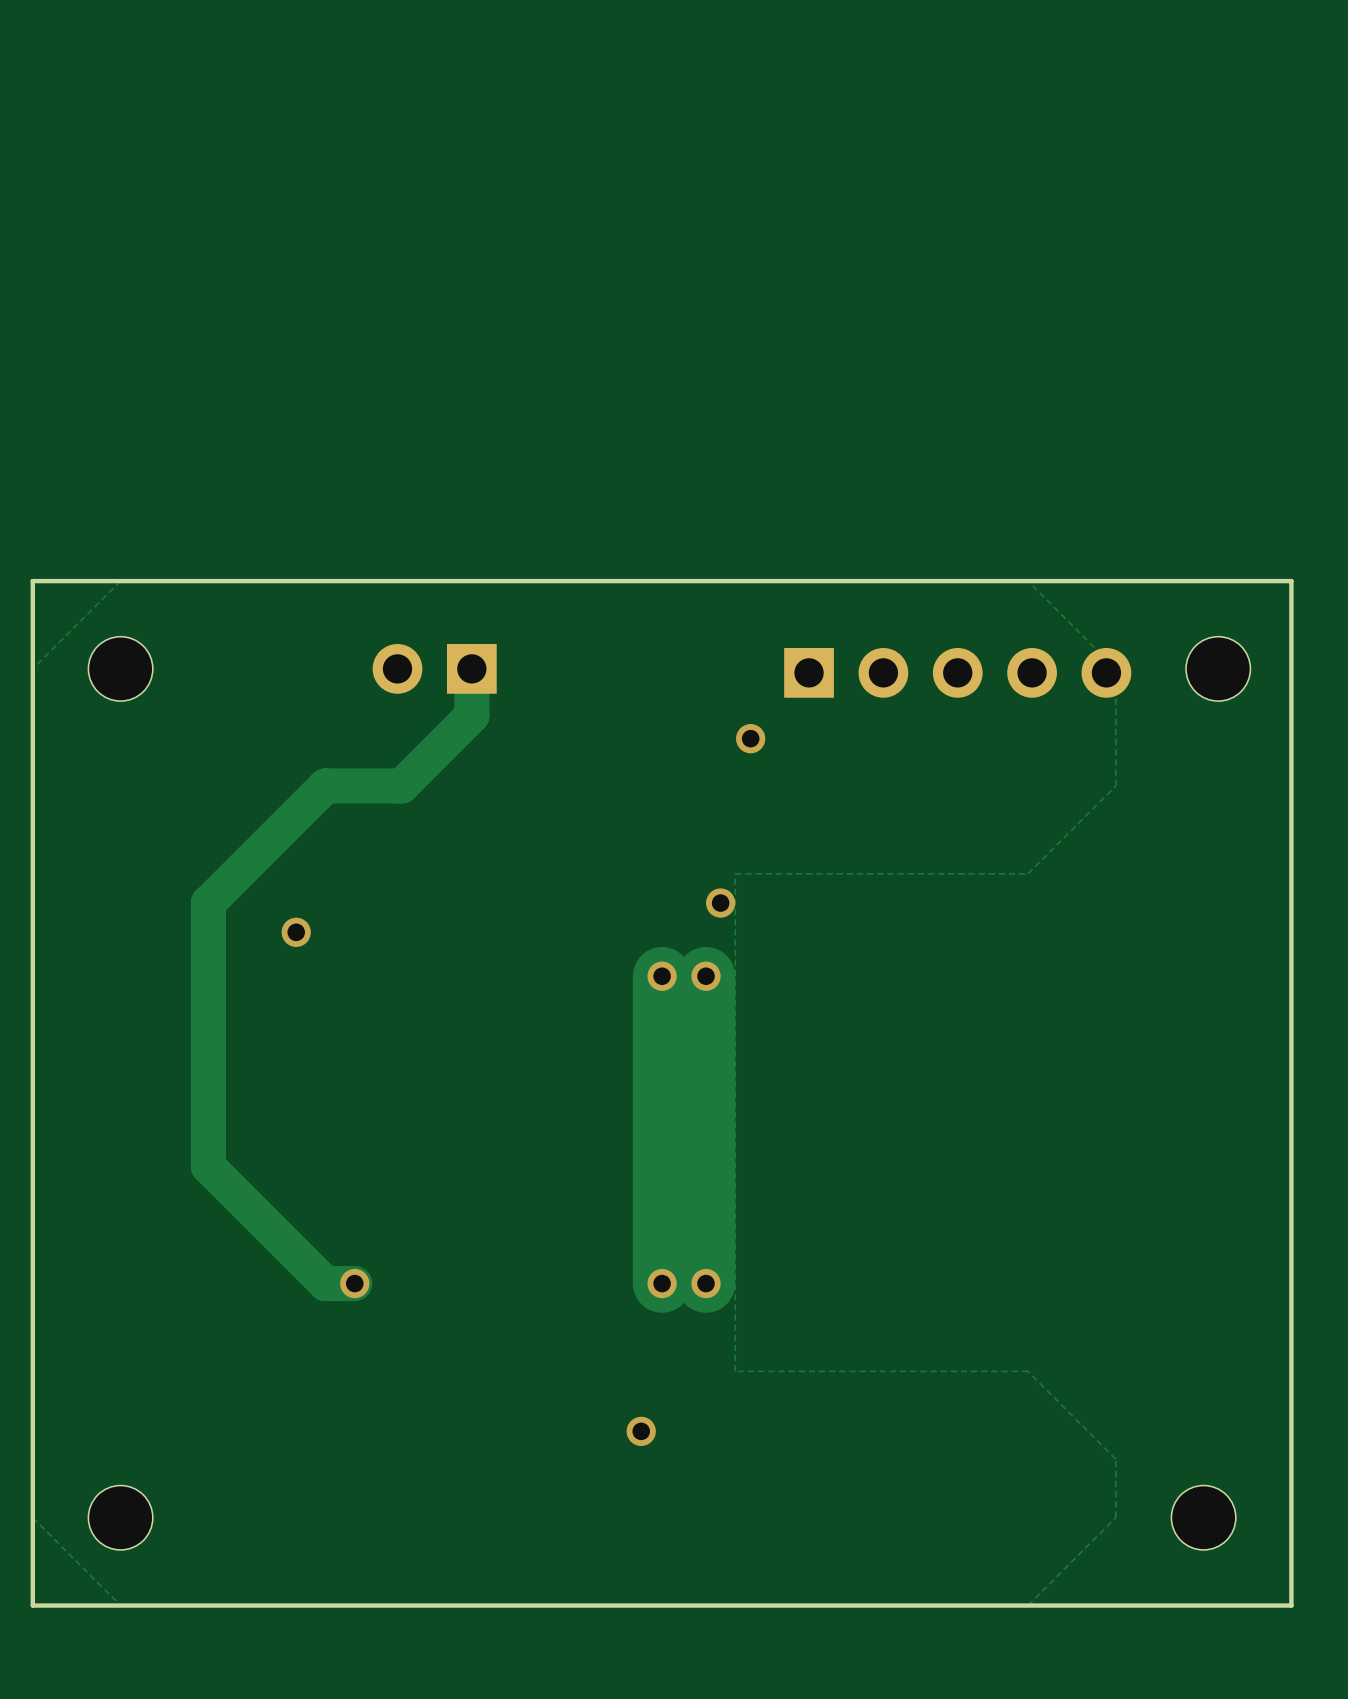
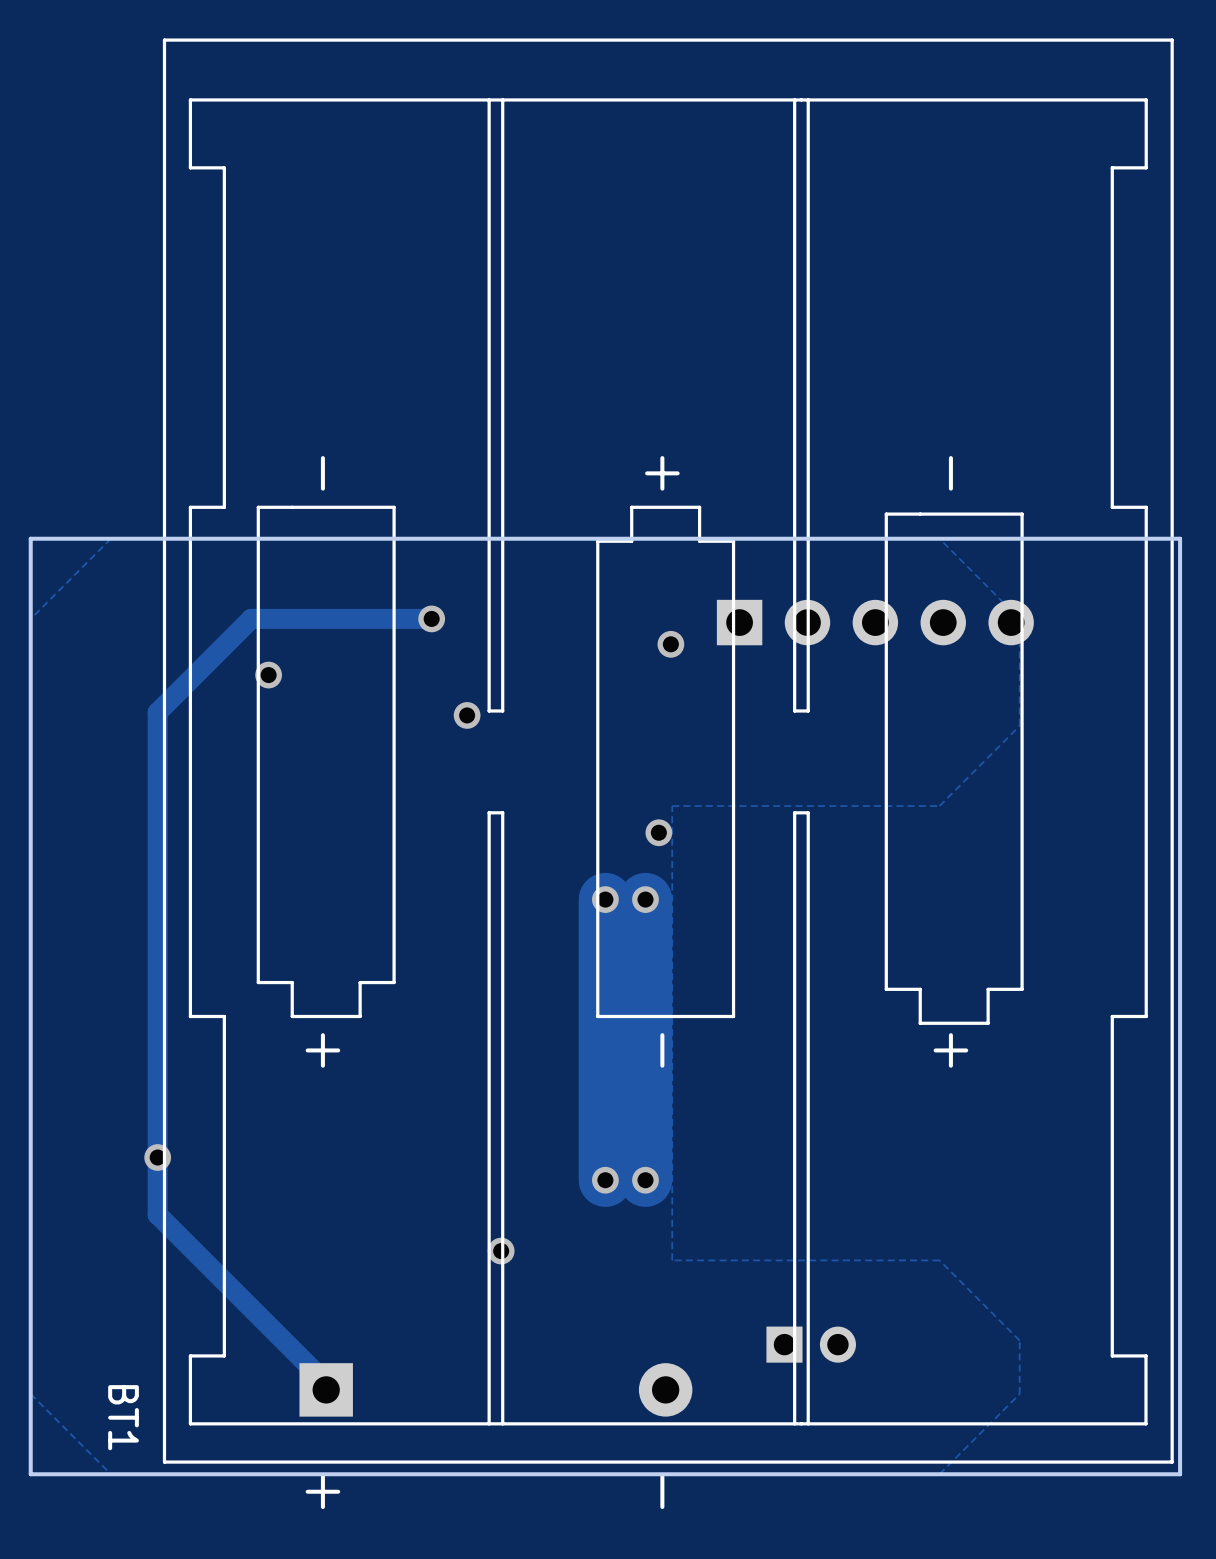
part: (120, 668) -> none
part: (434, 668) -> none
track: (471, 668) (471, 715) (401, 785) (325, 785) (208, 903) (208, 1166) (325, 1283) (354, 1283) -> (431, 618) (251, 618) (157, 712) (157, 1214) (324, 1381) (324, 1394)
via: none -> (431, 618)
part: (1218, 668) -> none
via: none -> (268, 675)
via position: (750, 738) -> (670, 644)
via: none -> (467, 715)
BT1: none -> (668, 751)
via: (296, 932) -> none
via: none -> (157, 1157)
via: (354, 1283) -> none
via: none -> (501, 1251)
via: (641, 1431) -> none
part: none -> (811, 1344)
part: (120, 1517) -> none
part: (1203, 1517) -> none

